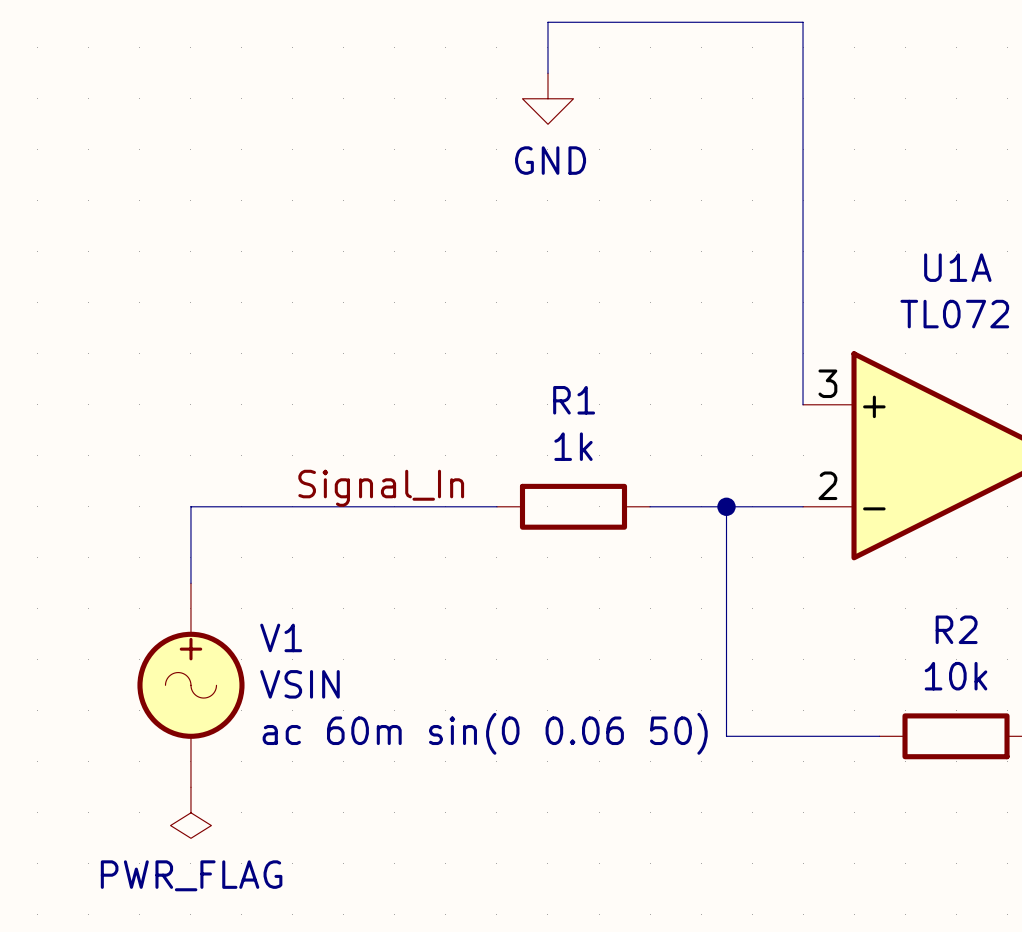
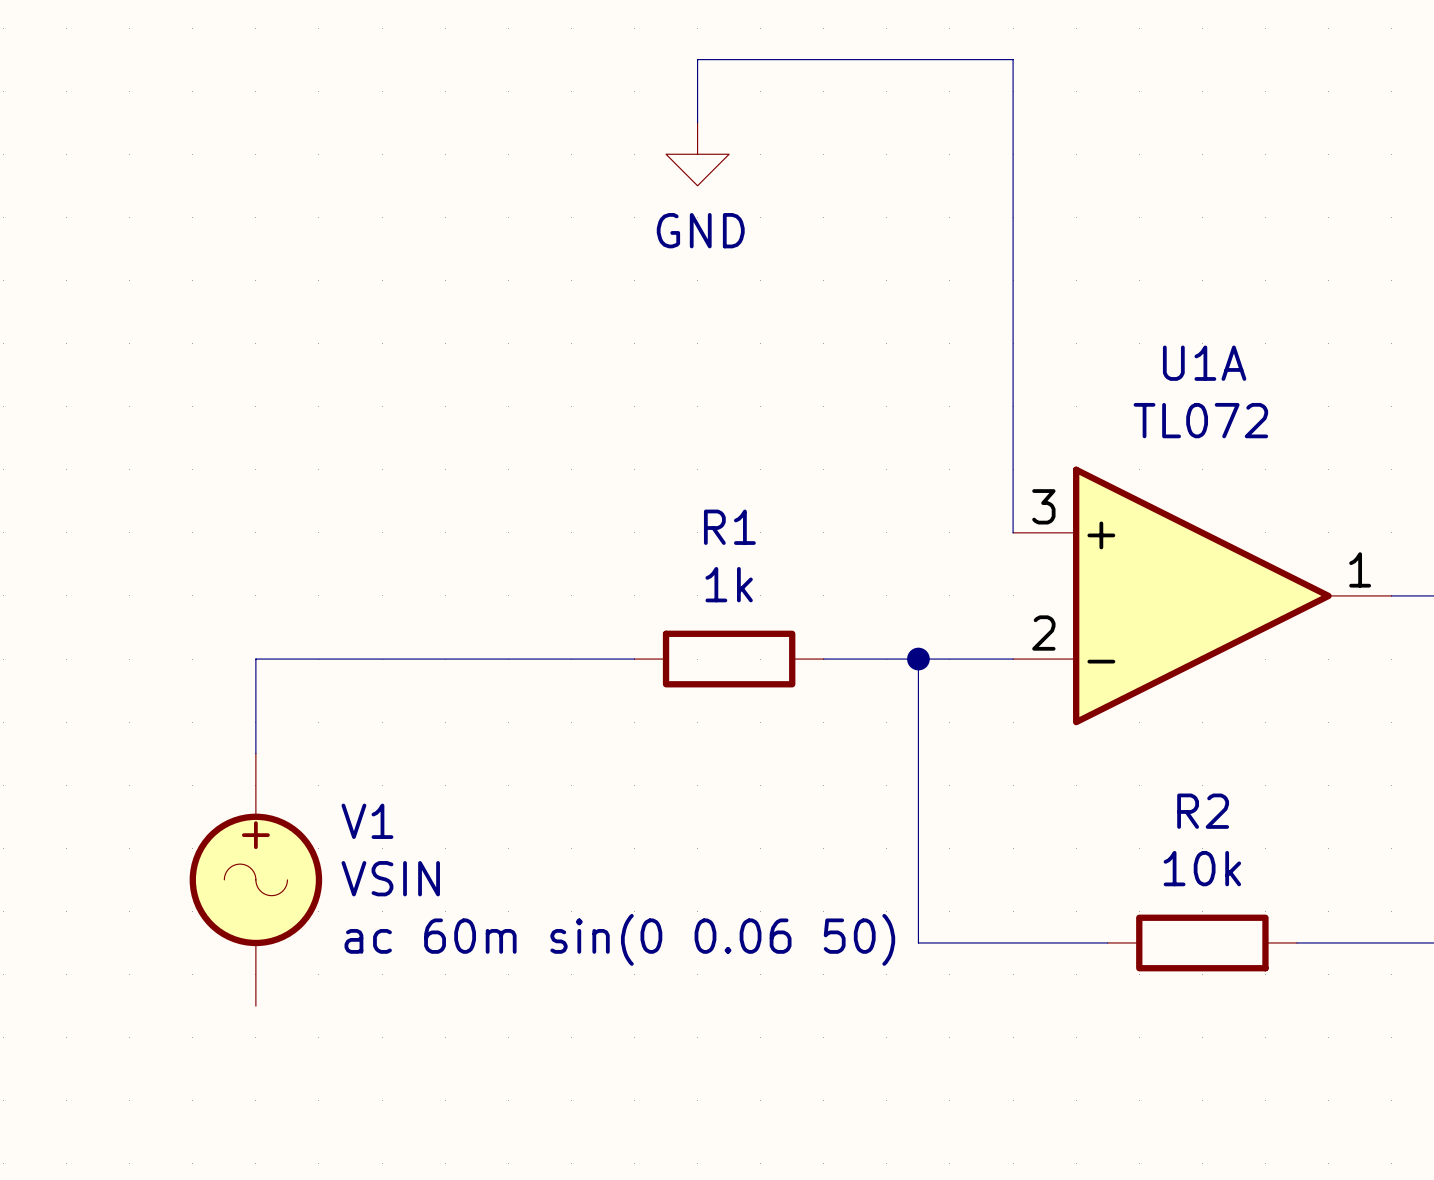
label: Signal_In (381, 488) -> none
power symbol: PWR_FLAG (190, 812) -> none

